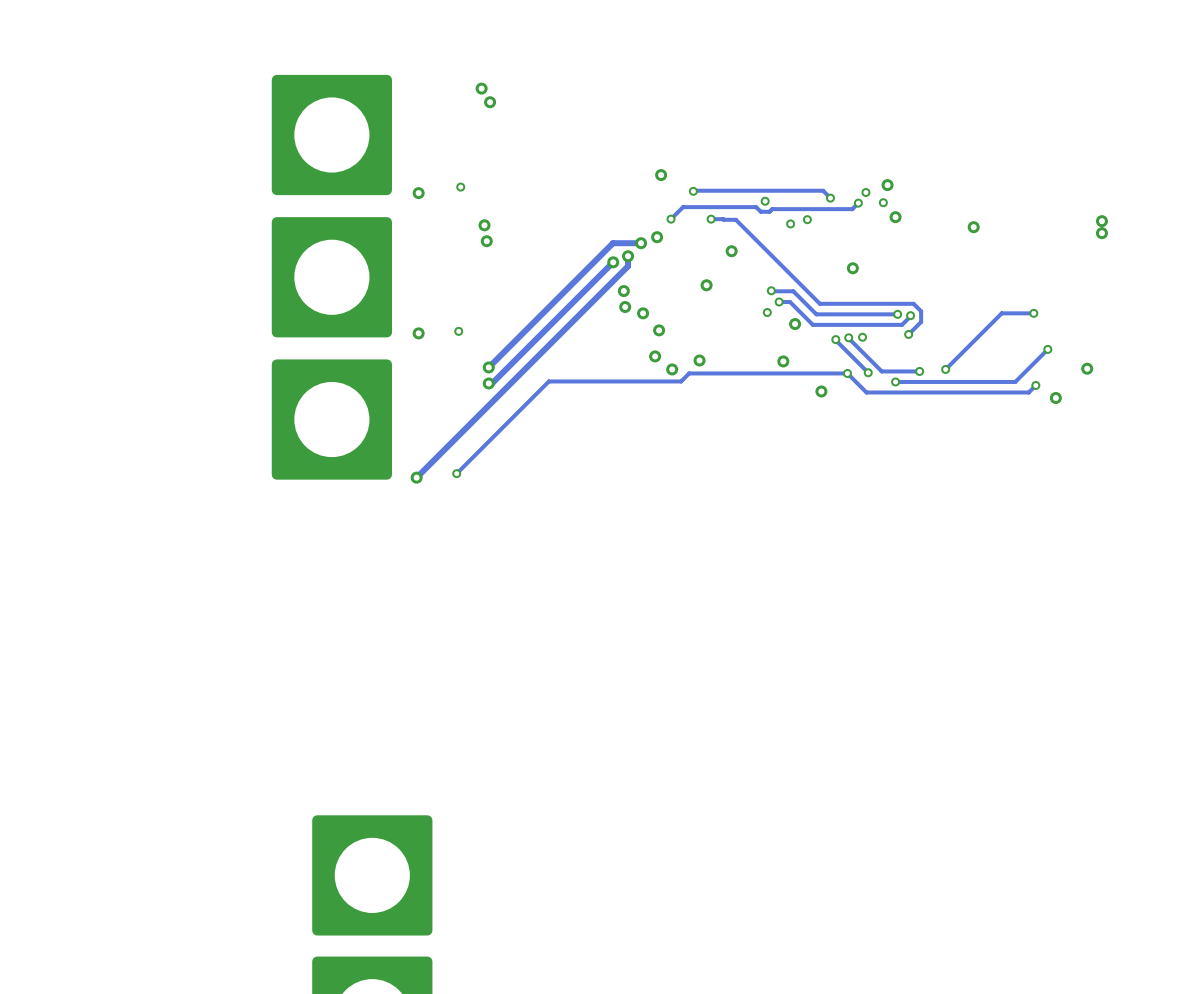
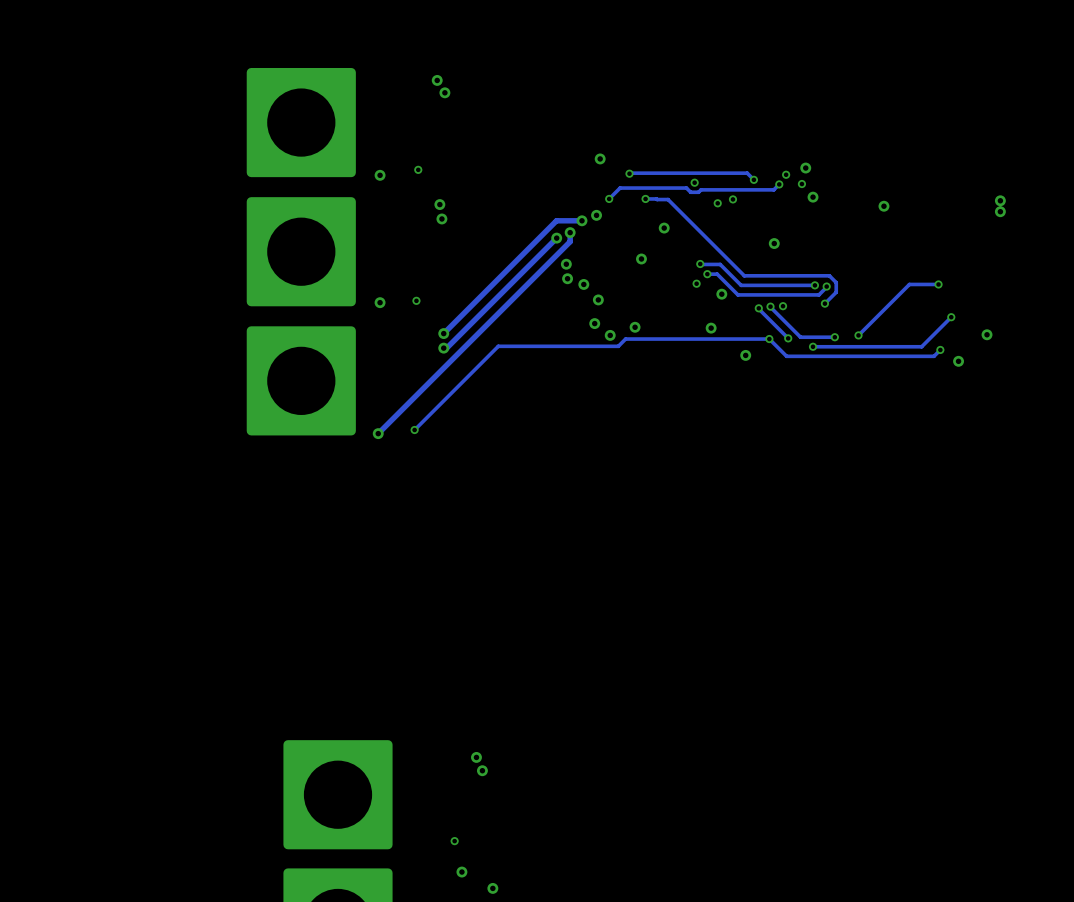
via: none -> (476, 757)
via: none -> (482, 770)
via: none -> (454, 841)
via: none -> (461, 872)
via: none -> (492, 888)

